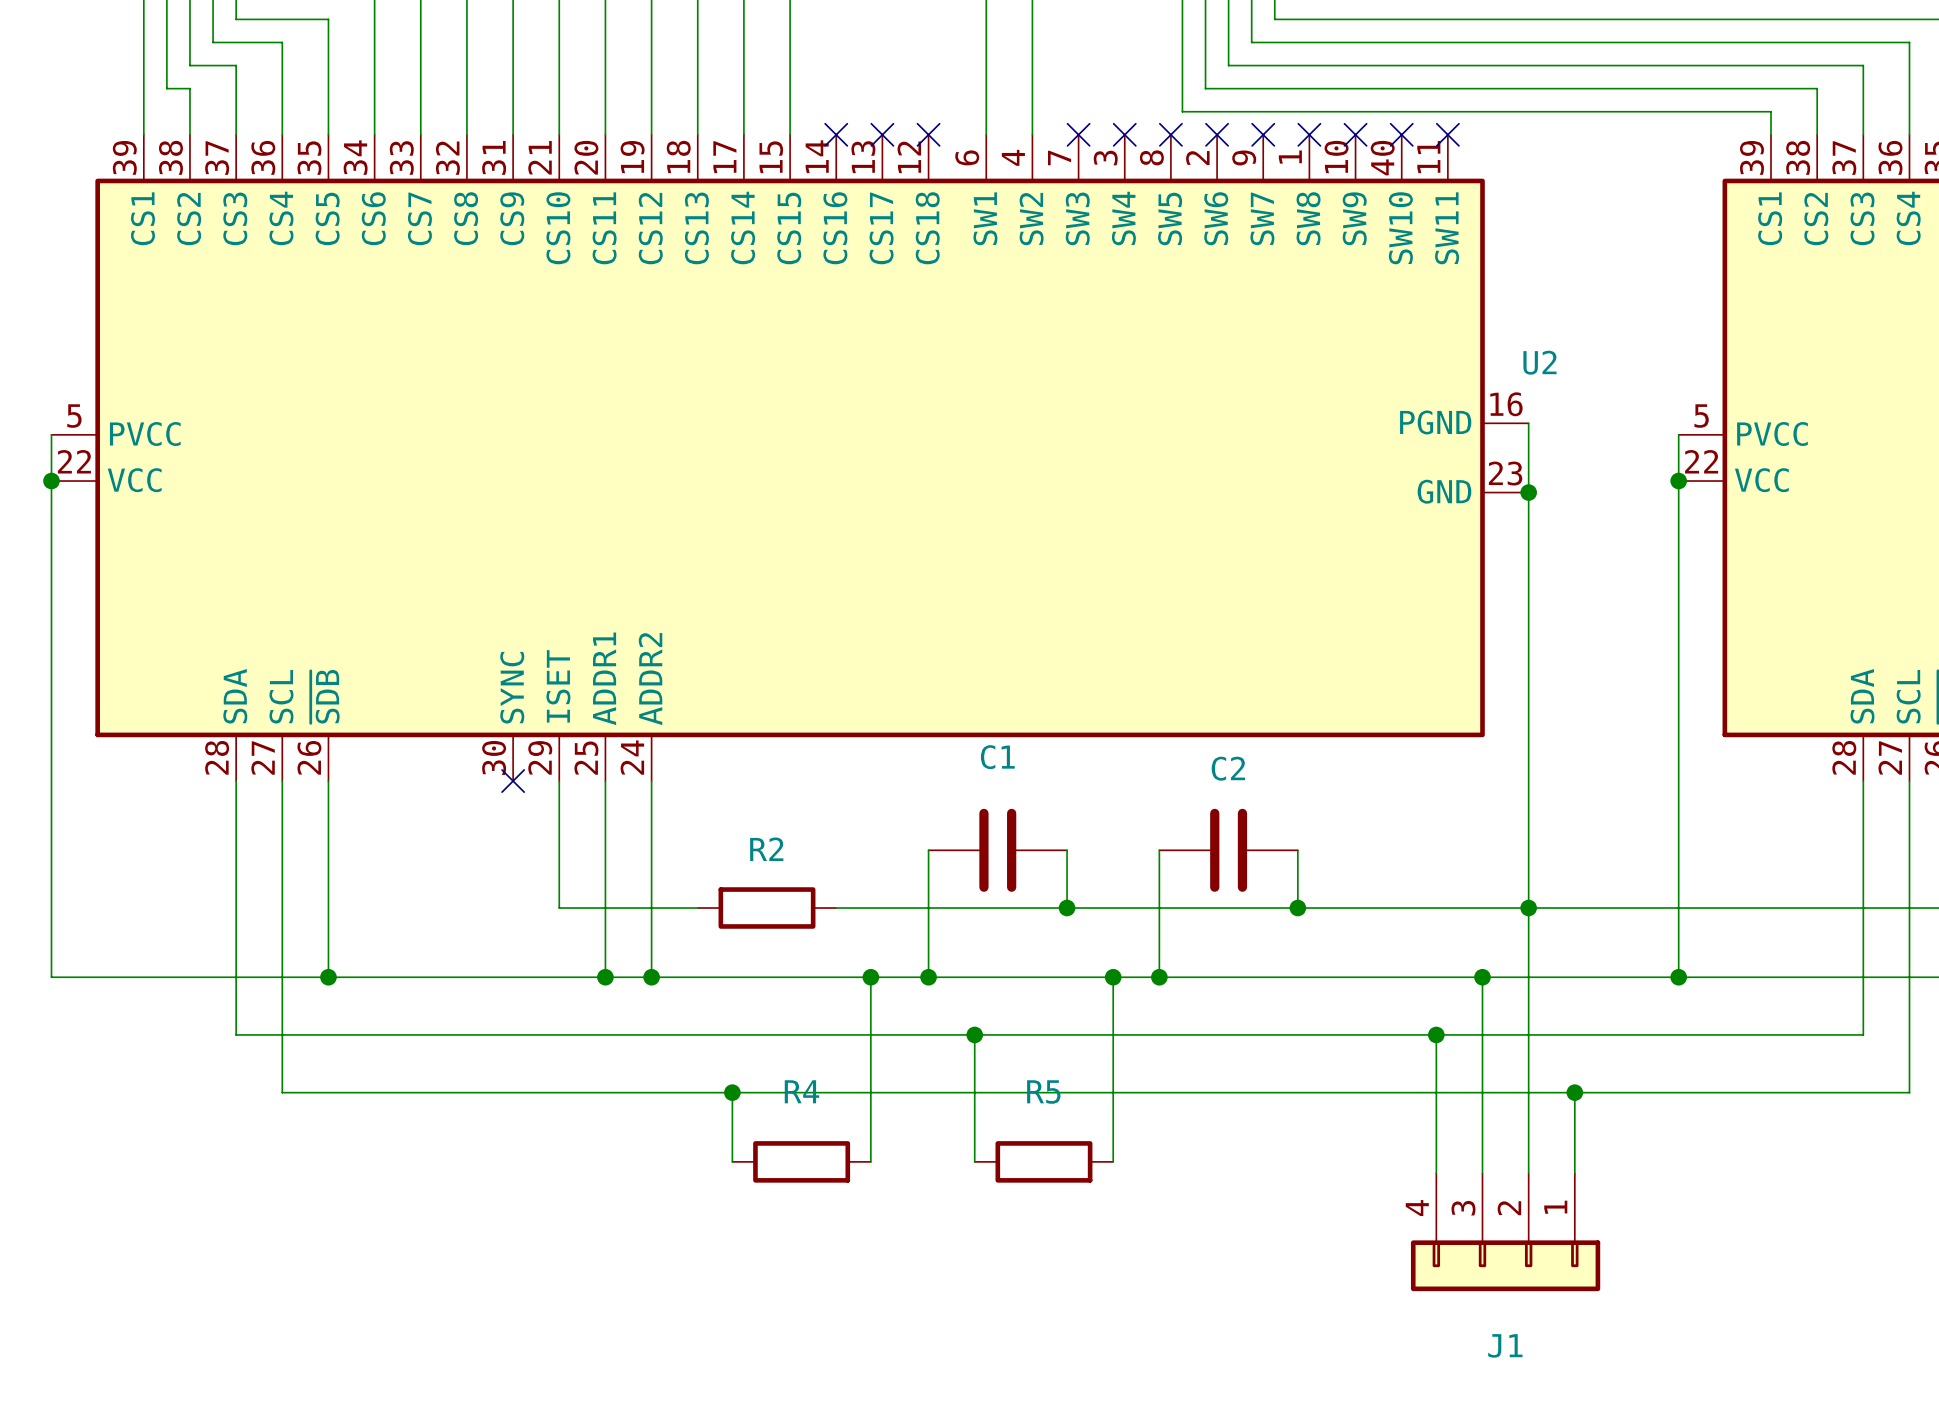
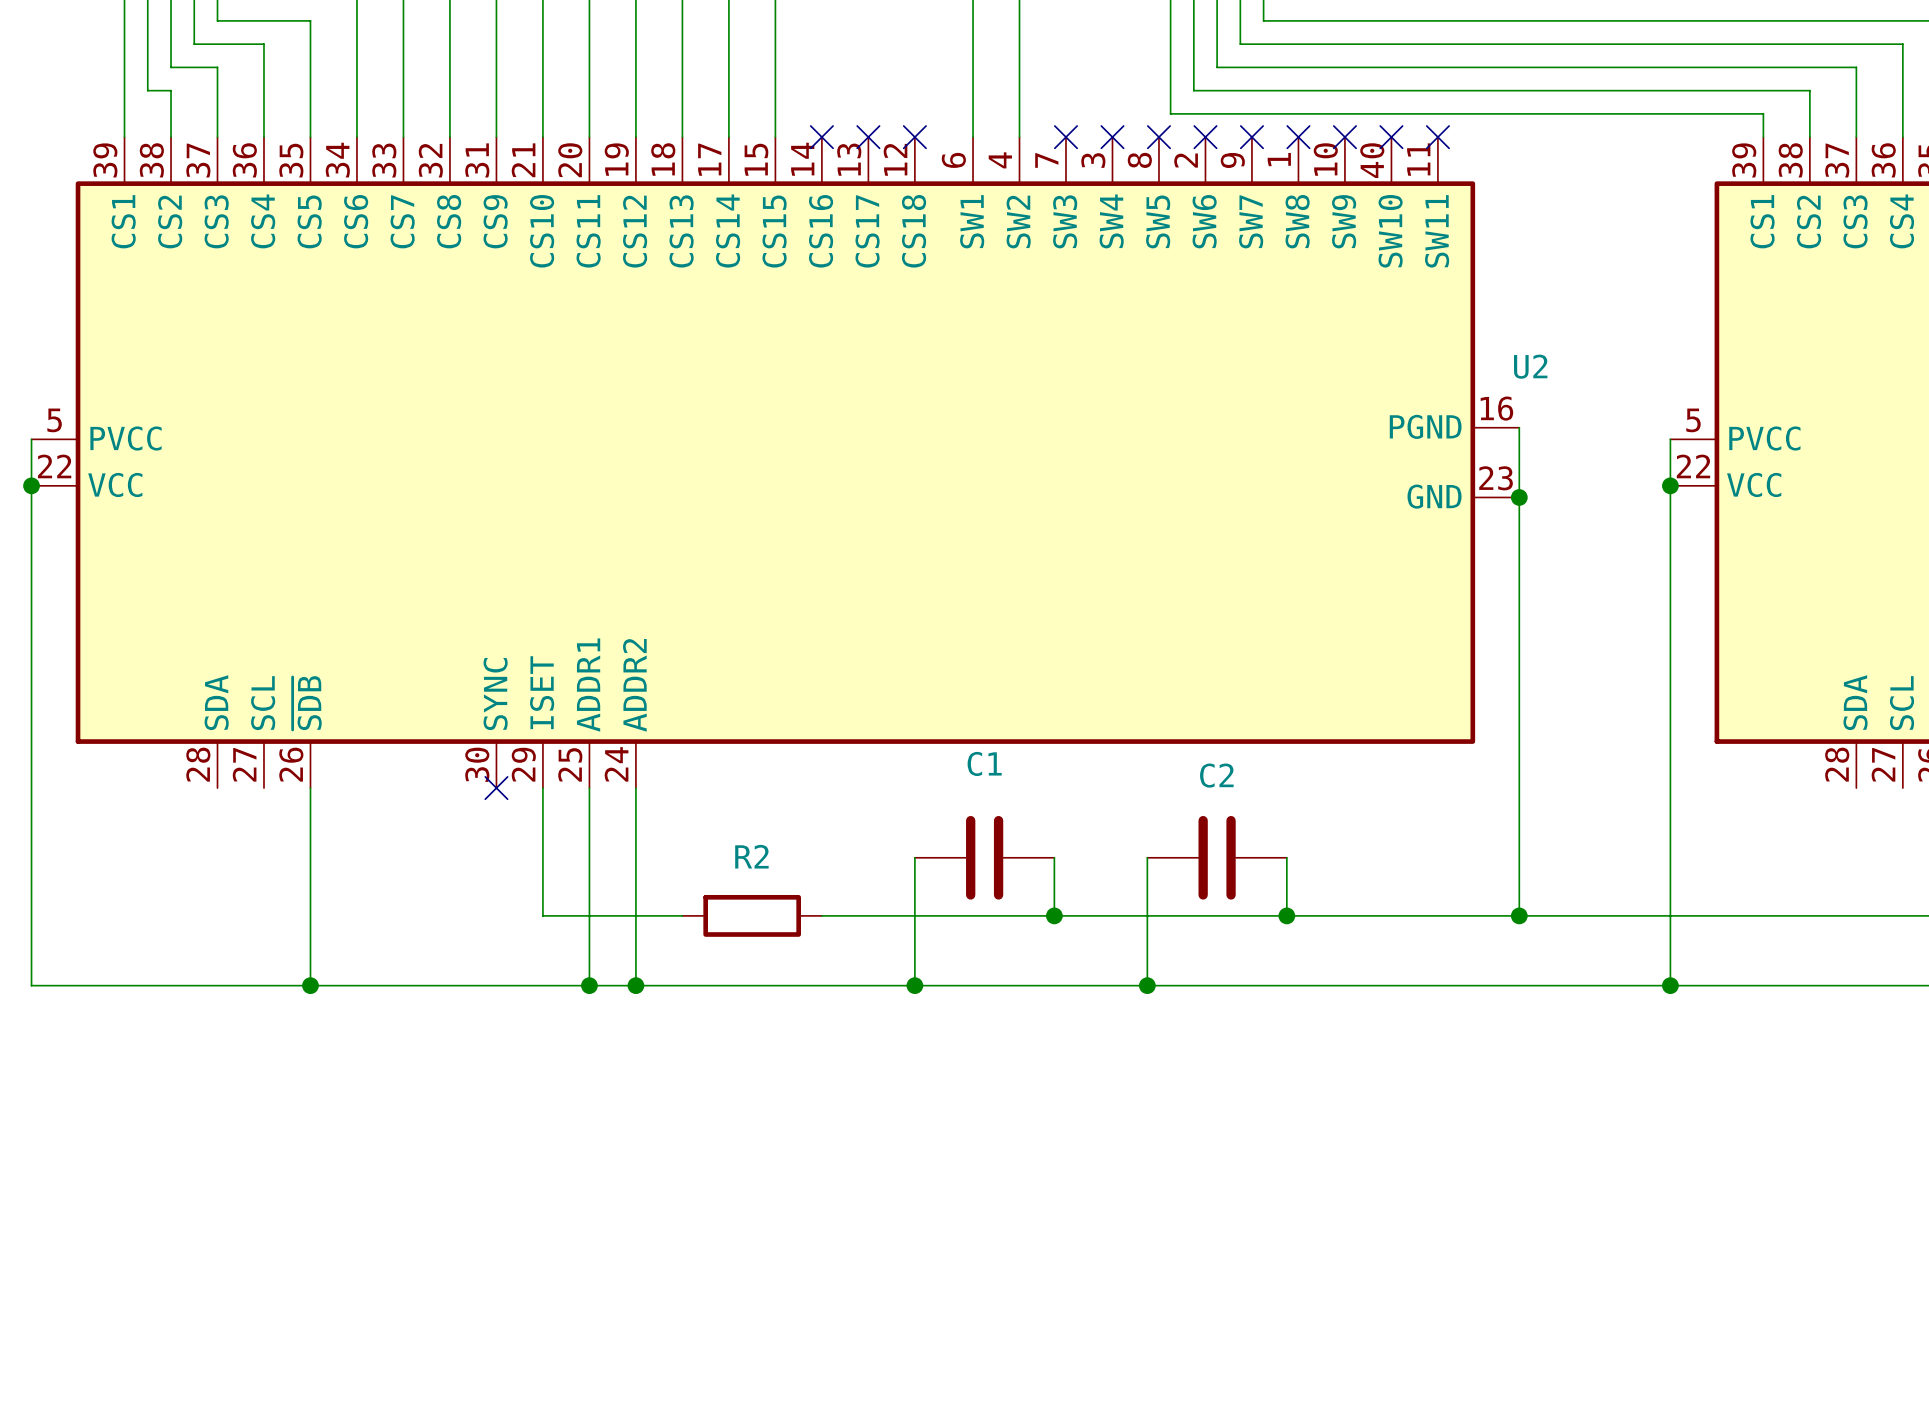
wire: (236, 781) (236, 1034) (1863, 1034) (1863, 781) -> none
wire: (282, 781) (282, 1092) (1909, 1092) (1909, 781) -> none
wire: (1528, 908) (1528, 1173) -> none
wire: (870, 977) (870, 1161) -> none
junction: (870, 977) -> none
wire: (1113, 977) (1113, 1161) -> none
junction: (1113, 977) -> none
wire: (1482, 977) (1482, 1173) -> none
junction: (1482, 977) -> none
wire: (974, 1034) (974, 1161) -> none
junction: (974, 1034) -> none
wire: (1436, 1034) (1436, 1173) -> none
junction: (1436, 1034) -> none
wire: (732, 1092) (732, 1161) -> none
junction: (732, 1092) -> none
wire: (1574, 1092) (1574, 1173) -> none
junction: (1574, 1092) -> none
R4: (801, 1161) -> none
R5: (1043, 1161) -> none
J1: (1505, 1232) -> none

